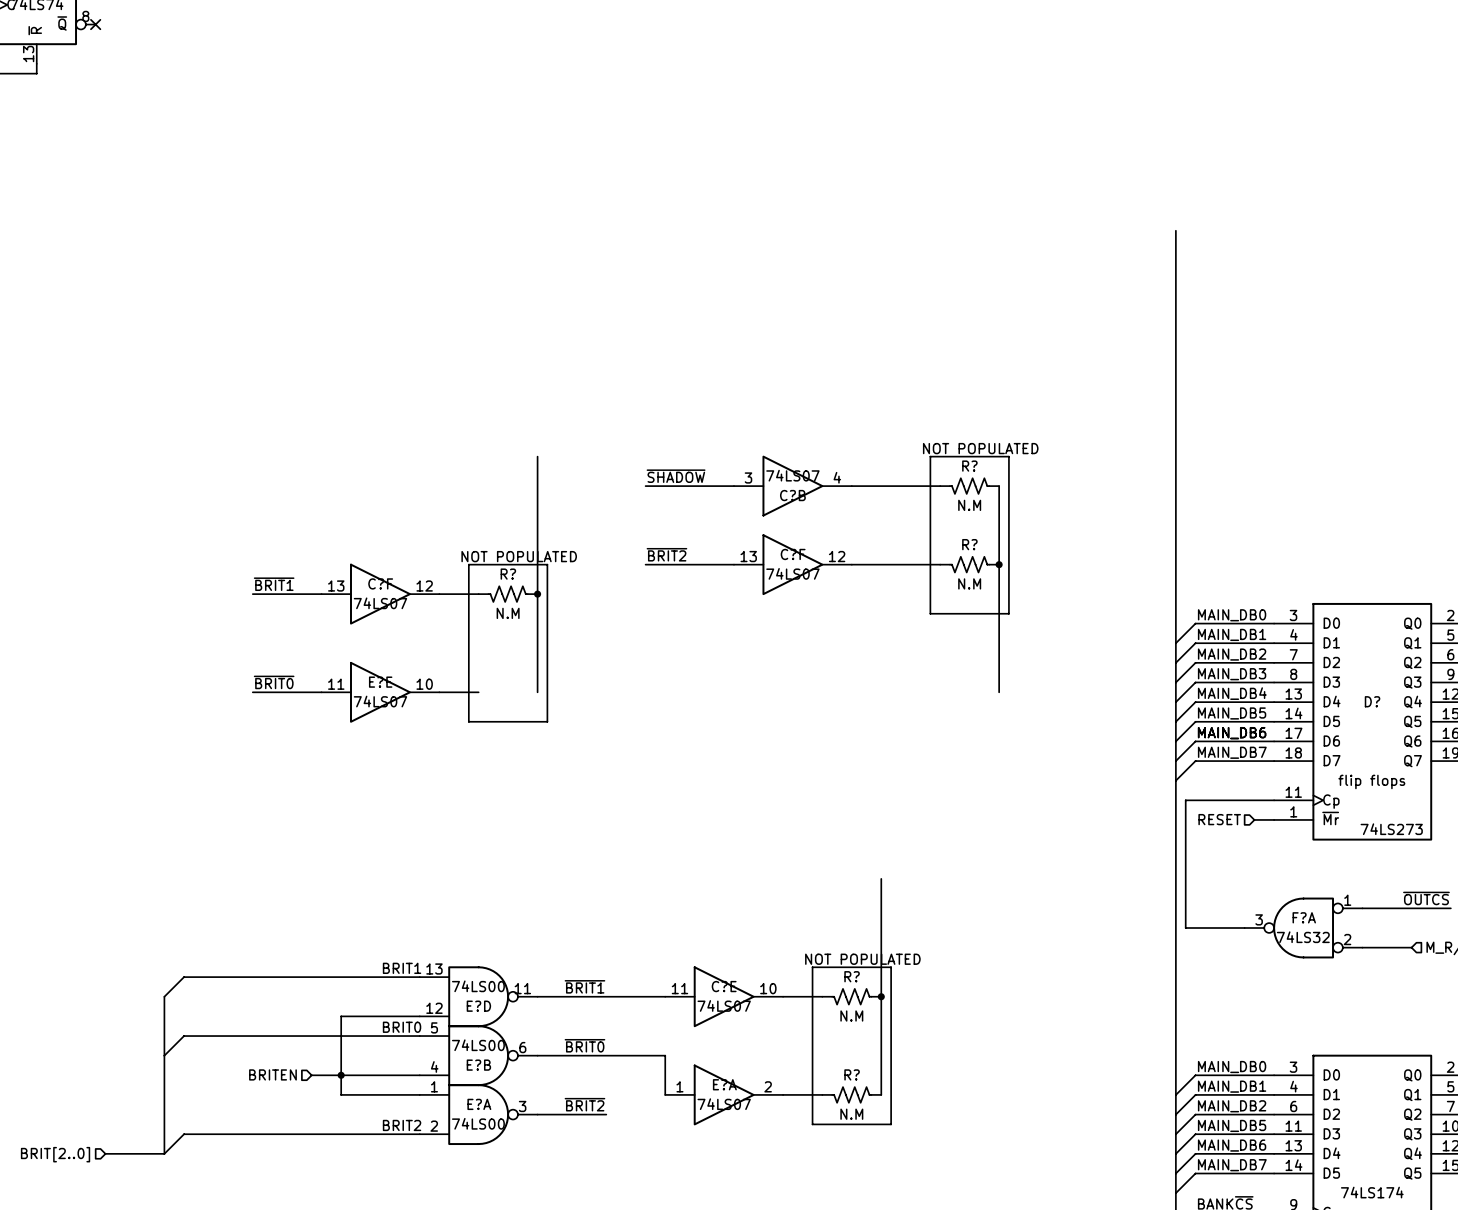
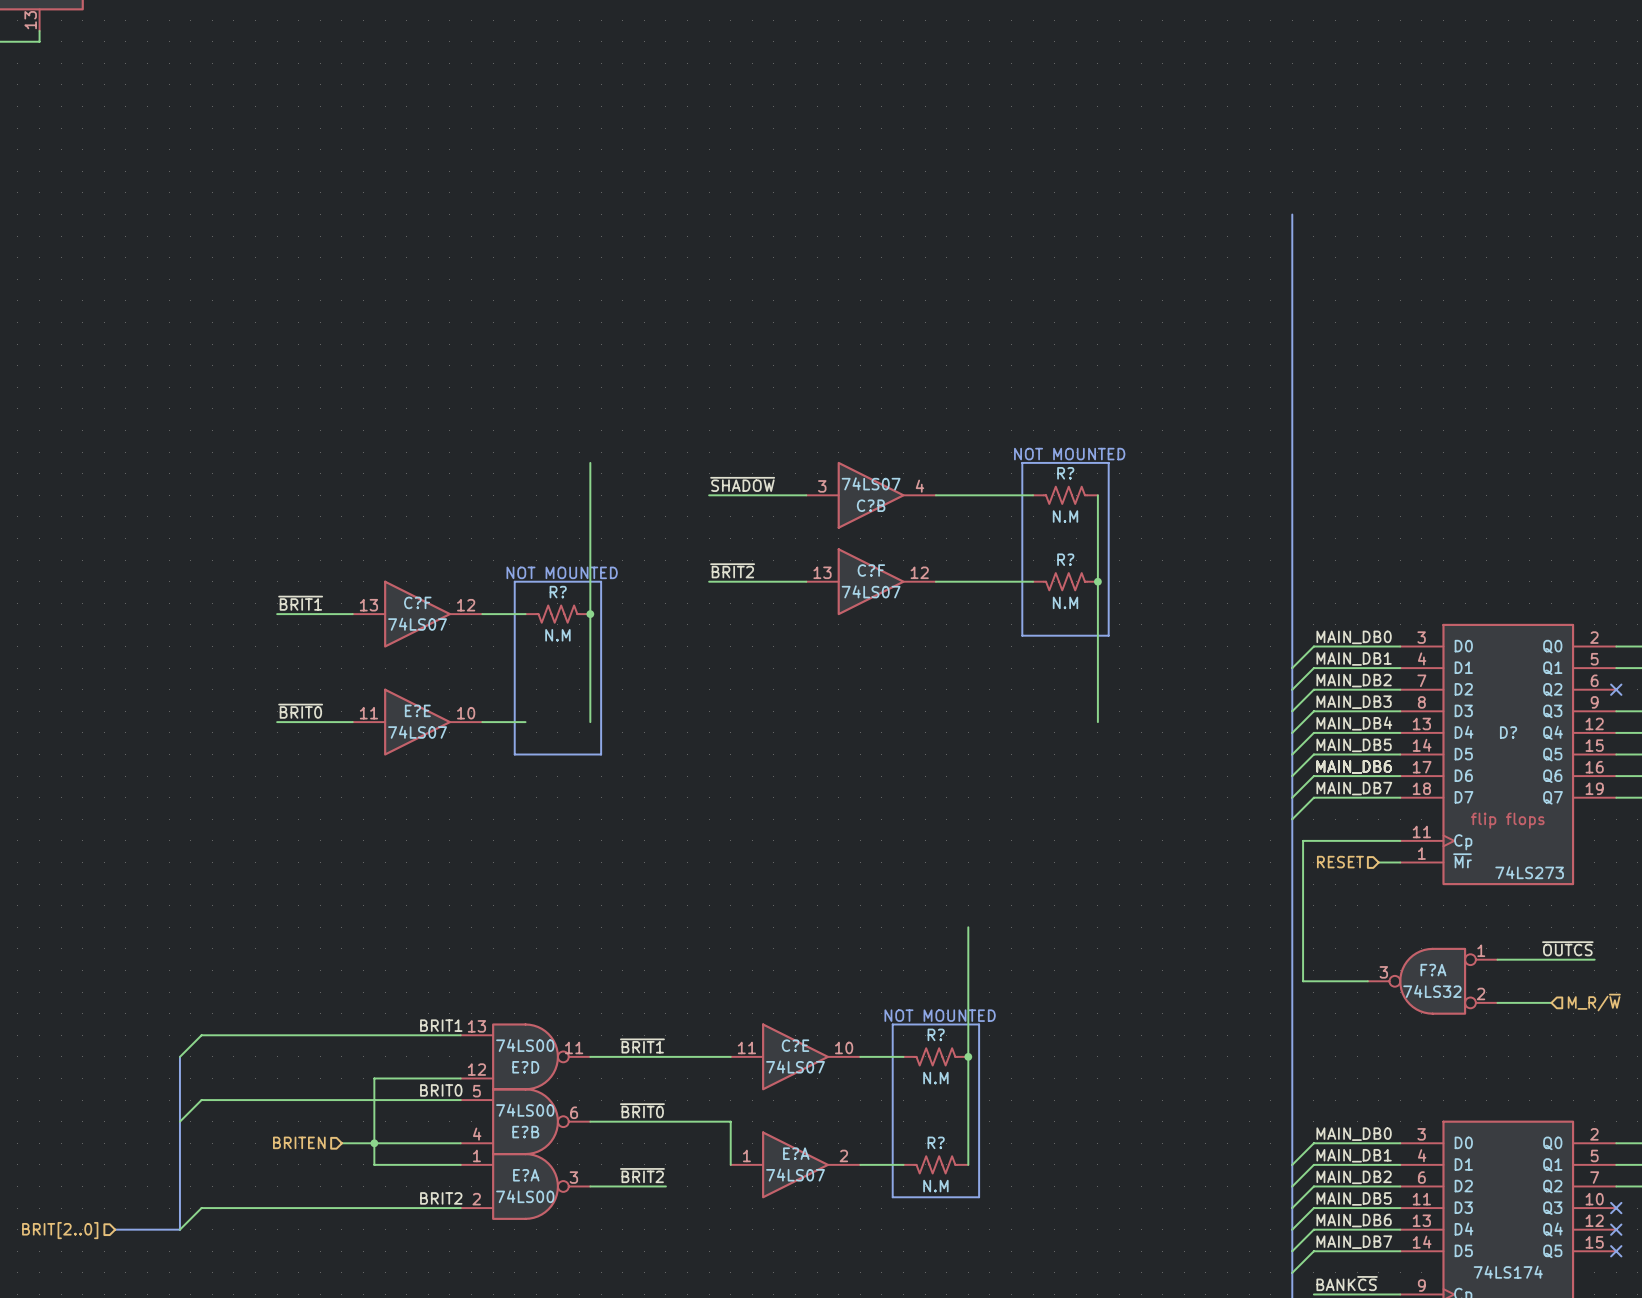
text: NOT POPULATED (980, 448) -> NOT MOUNTED (1069, 454)
text: NOT POPULATED (519, 556) -> NOT MOUNTED (562, 572)
text: NOT POPULATED (862, 959) -> NOT MOUNTED (940, 1015)

